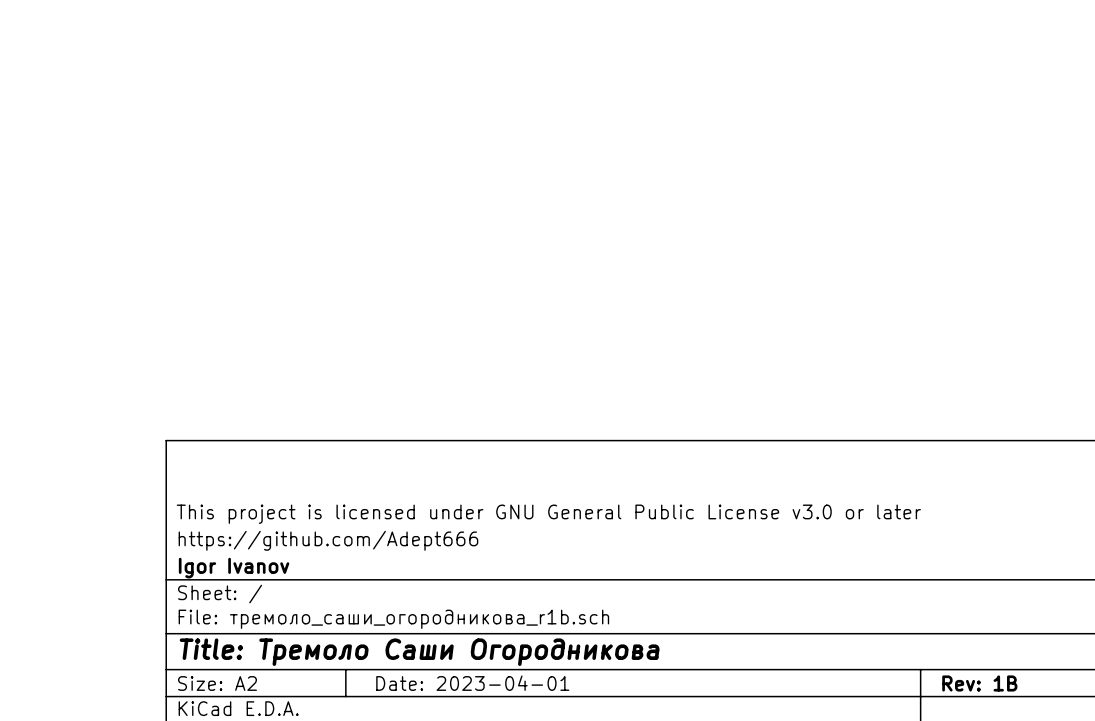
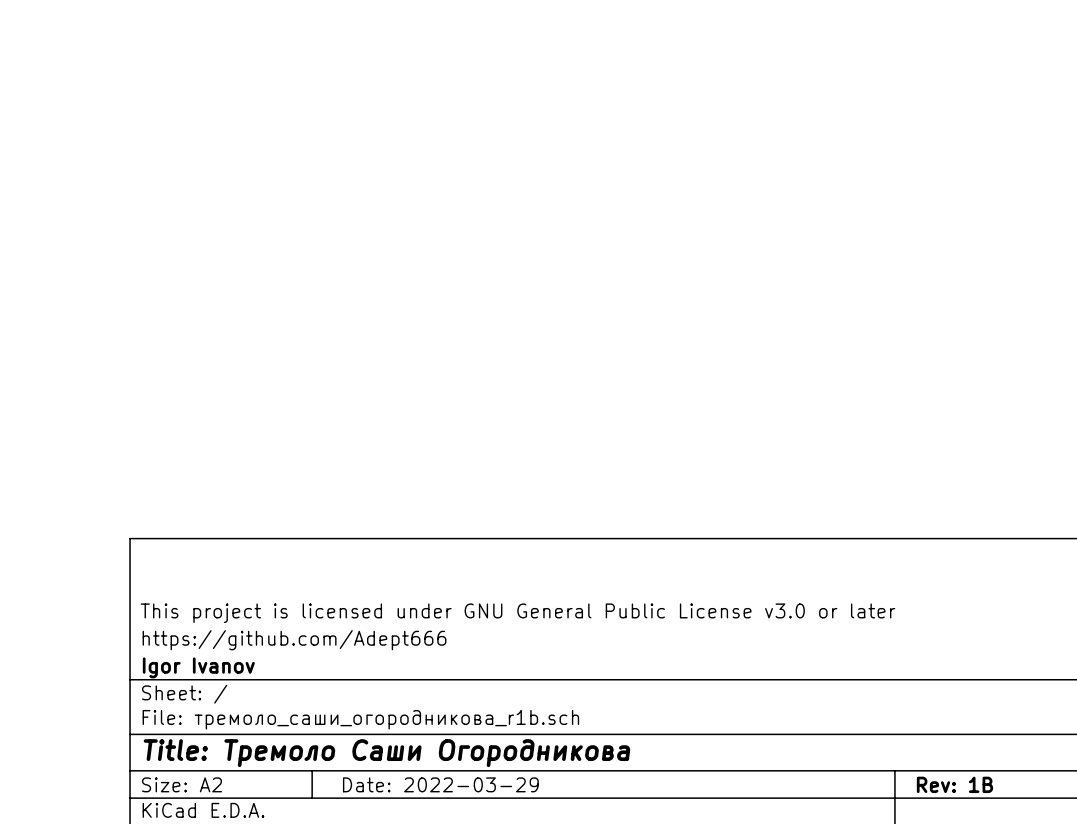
title block: Date: 2023-04-01 (472, 683) -> Date: 2022-03-29 (440, 784)

